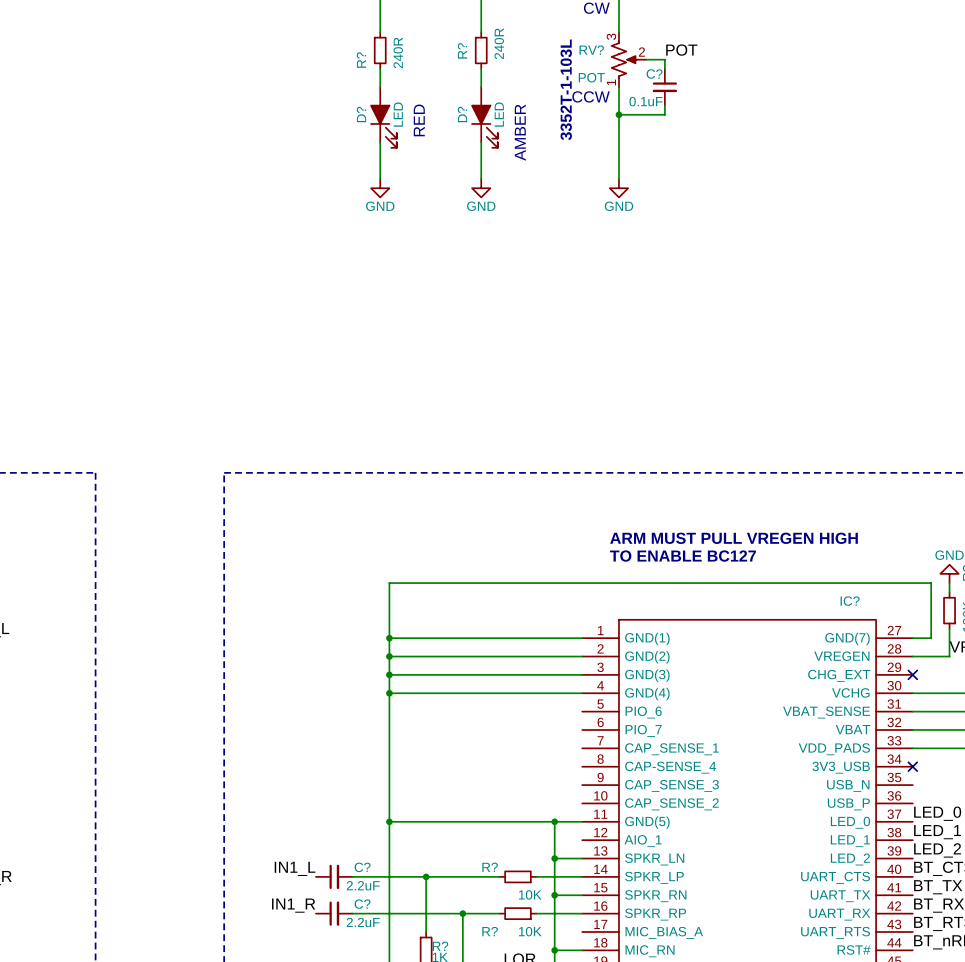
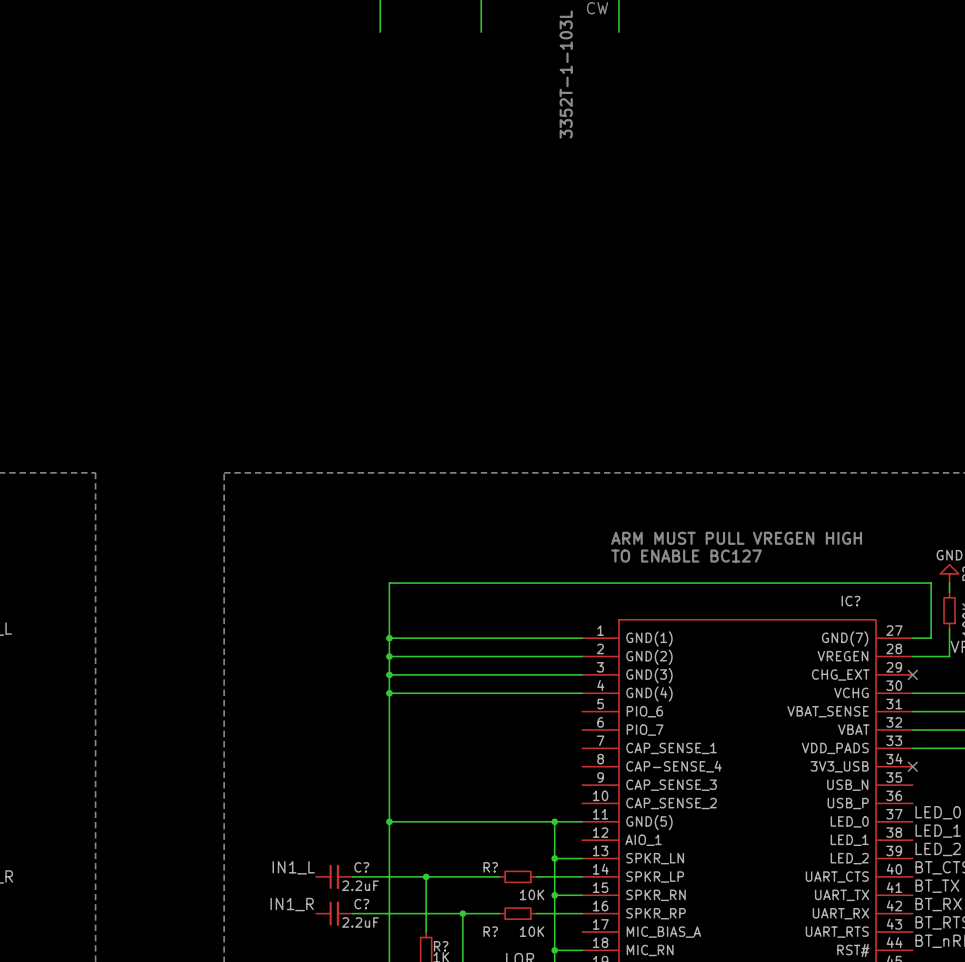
R?: 240R (380, 50) -> none
R?: 240R (481, 50) -> none
label: POT (681, 50) -> none
RV?: POT (629, 59) -> none
wire: (646, 59) (664, 59) (664, 68) -> none
wire: (380, 68) (380, 87) -> none
wire: (481, 68) (481, 87) -> none
wire: (618, 87) (618, 179) -> none
C?: 0.1uF (664, 87) -> none
text: CCW (591, 96) -> none
wire: (664, 105) (664, 114) (618, 114) -> none
junction: (618, 114) -> none
D?: LED (383, 117) -> none
D?: LED (484, 117) -> none
text: RED (419, 120) -> none
text: AMBER (520, 132) -> none
wire: (380, 142) (380, 179) -> none
wire: (481, 142) (481, 179) -> none
power symbol: GND (380, 188) -> none
power symbol: GND (481, 188) -> none
power symbol: GND (618, 188) -> none

